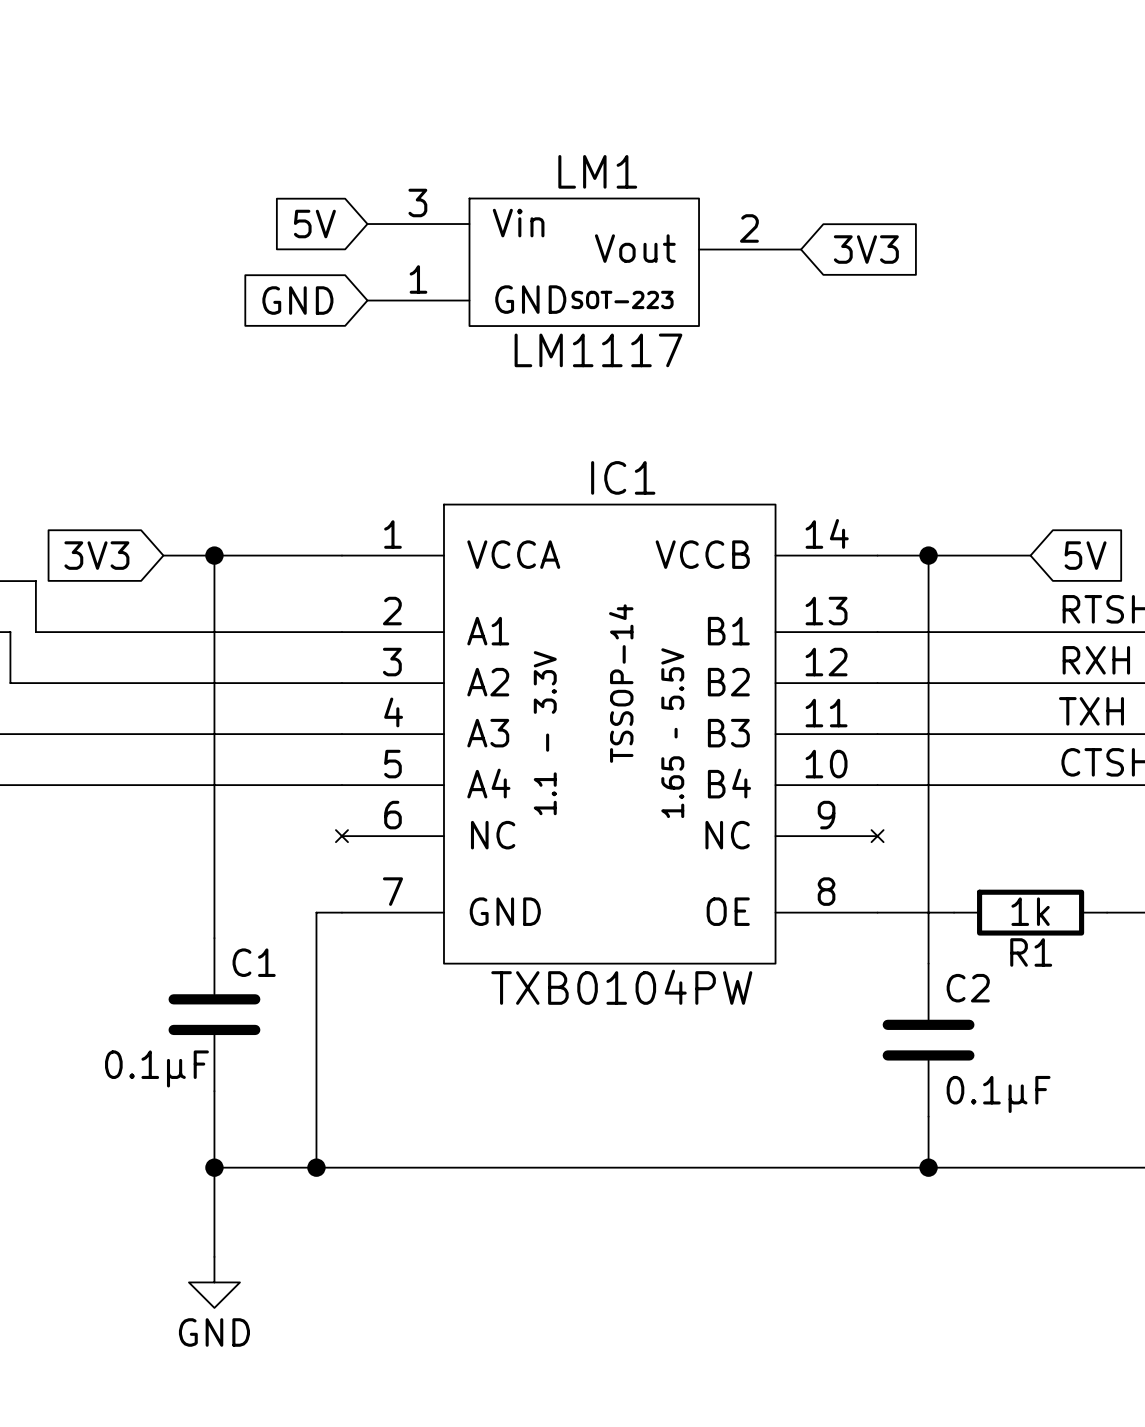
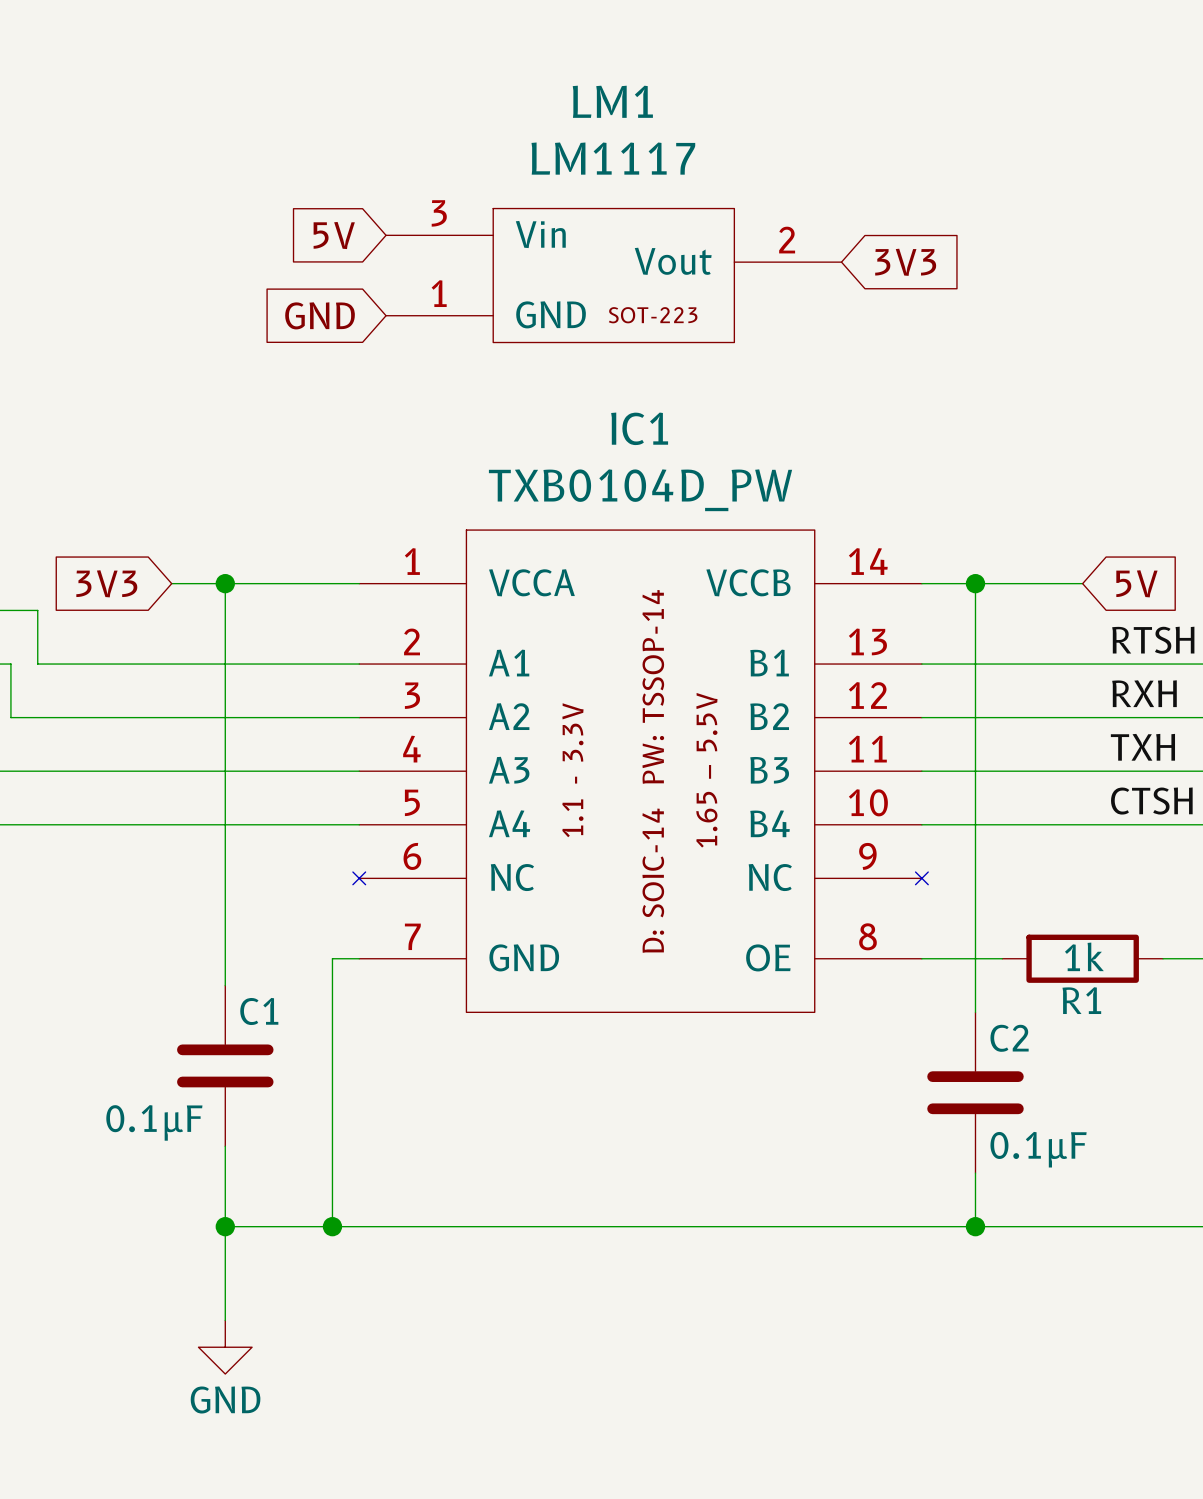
LM1 name position: LM1 (597, 171) -> LM1 (612, 101)
LM1 value position: LM1117 (598, 350) -> LM1117 (613, 158)
IC1 name position: IC1 (623, 477) -> IC1 (639, 428)
IC1 text: TSSOP-14 (621, 683) -> none
IC1 text: none -> D: SOIC-14 PW: TSSOP-14 (653, 771)
IC1 value: TXB0104PW (621, 987) -> TXB0104D_PW (640, 490)

